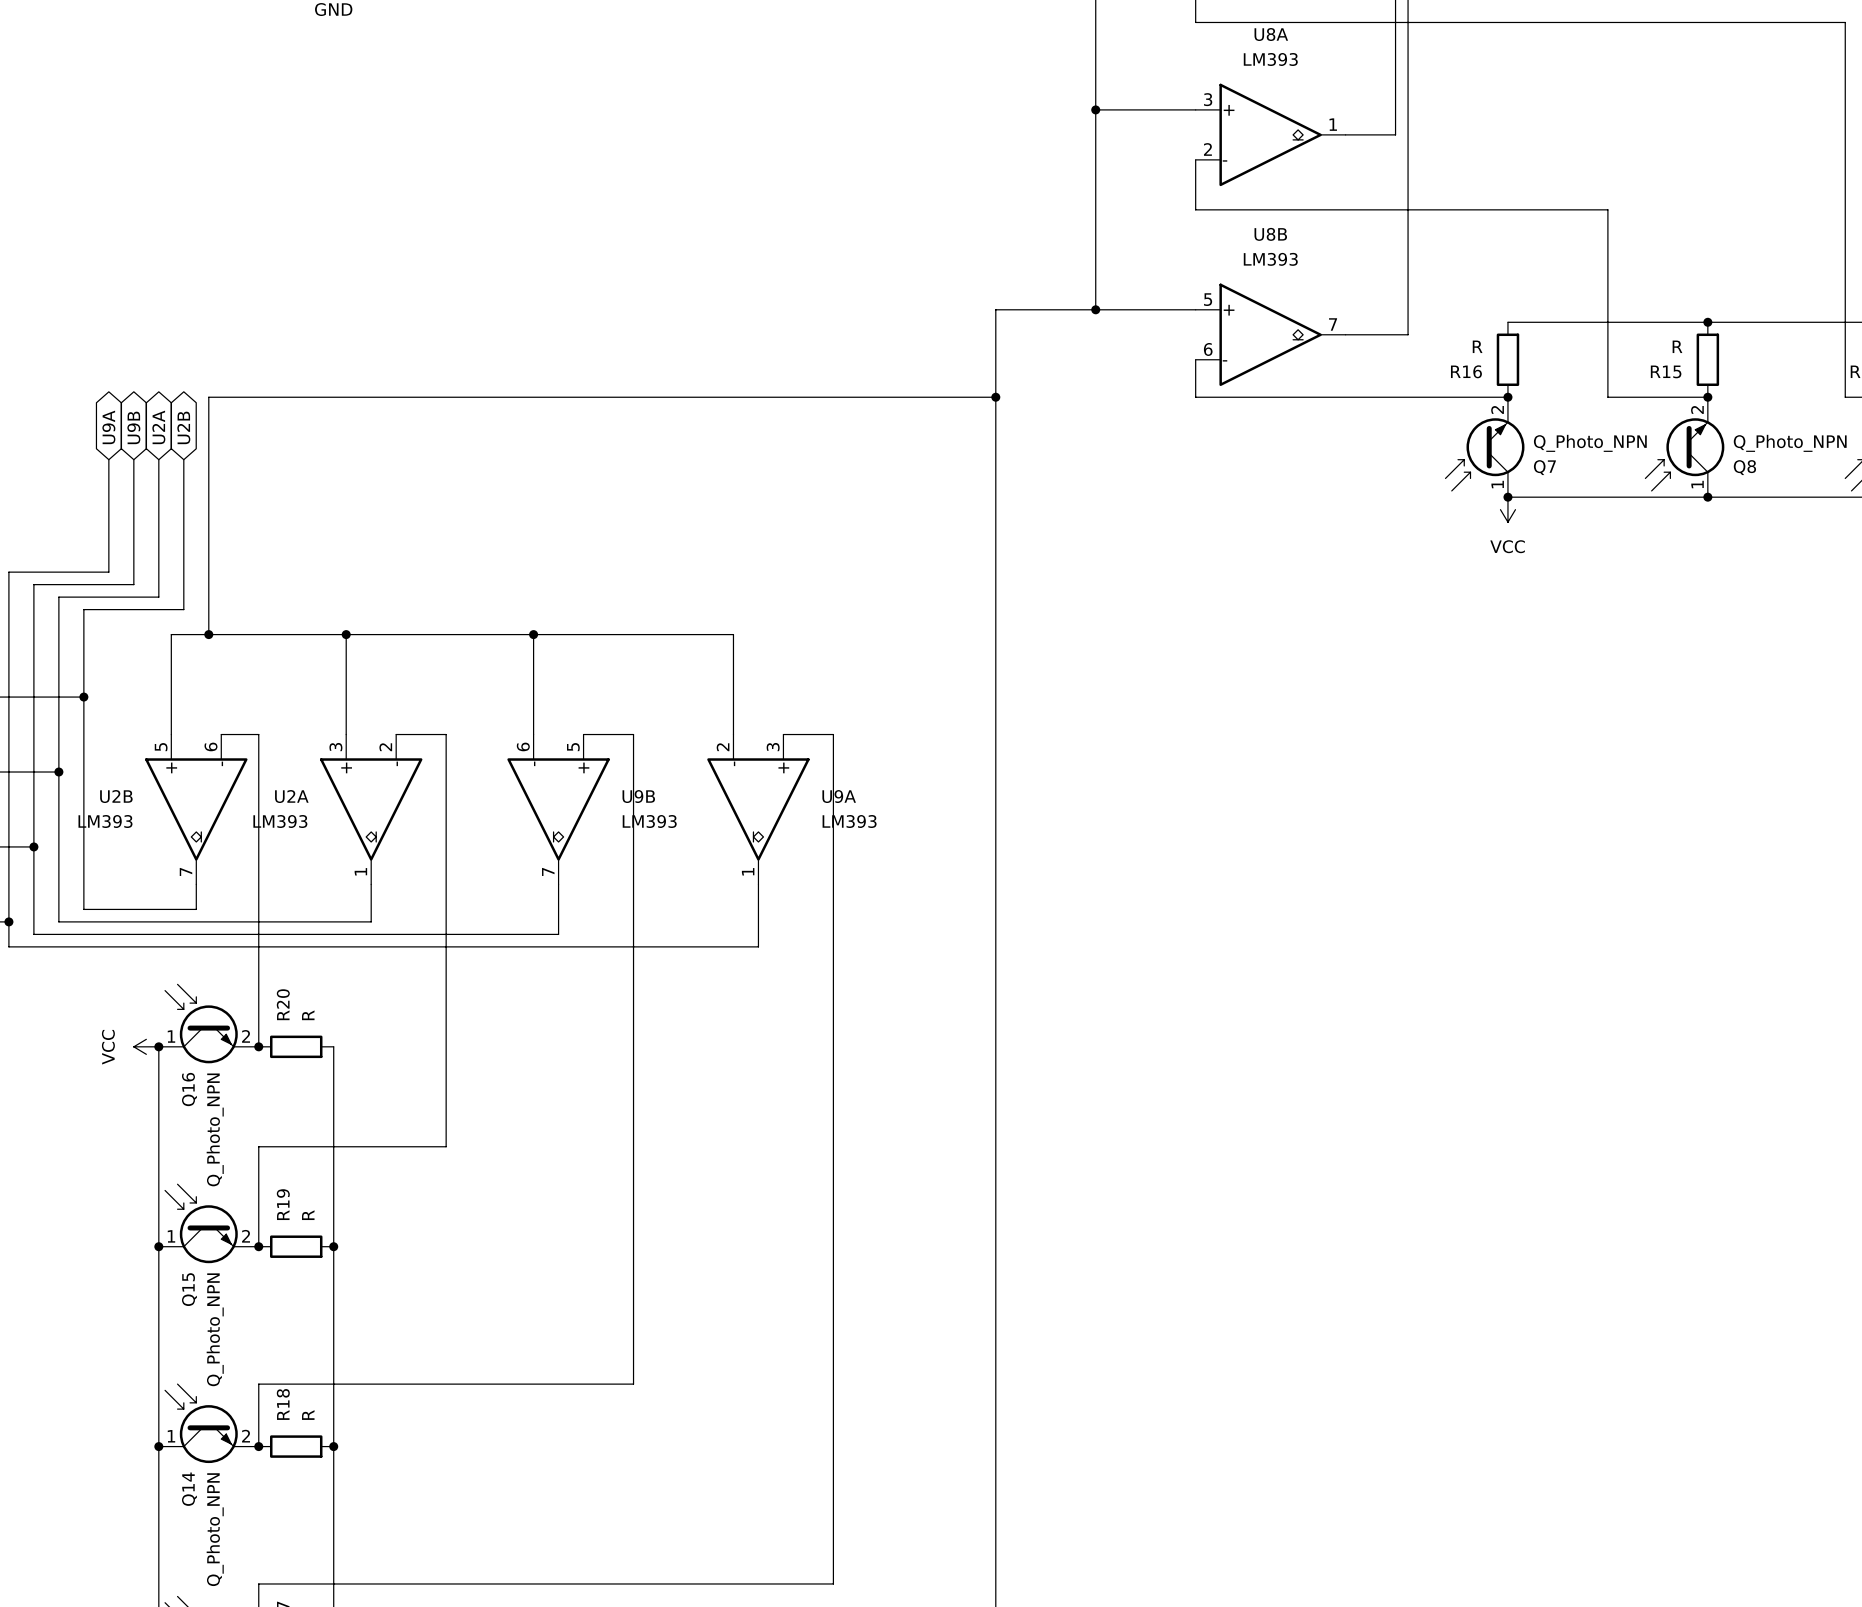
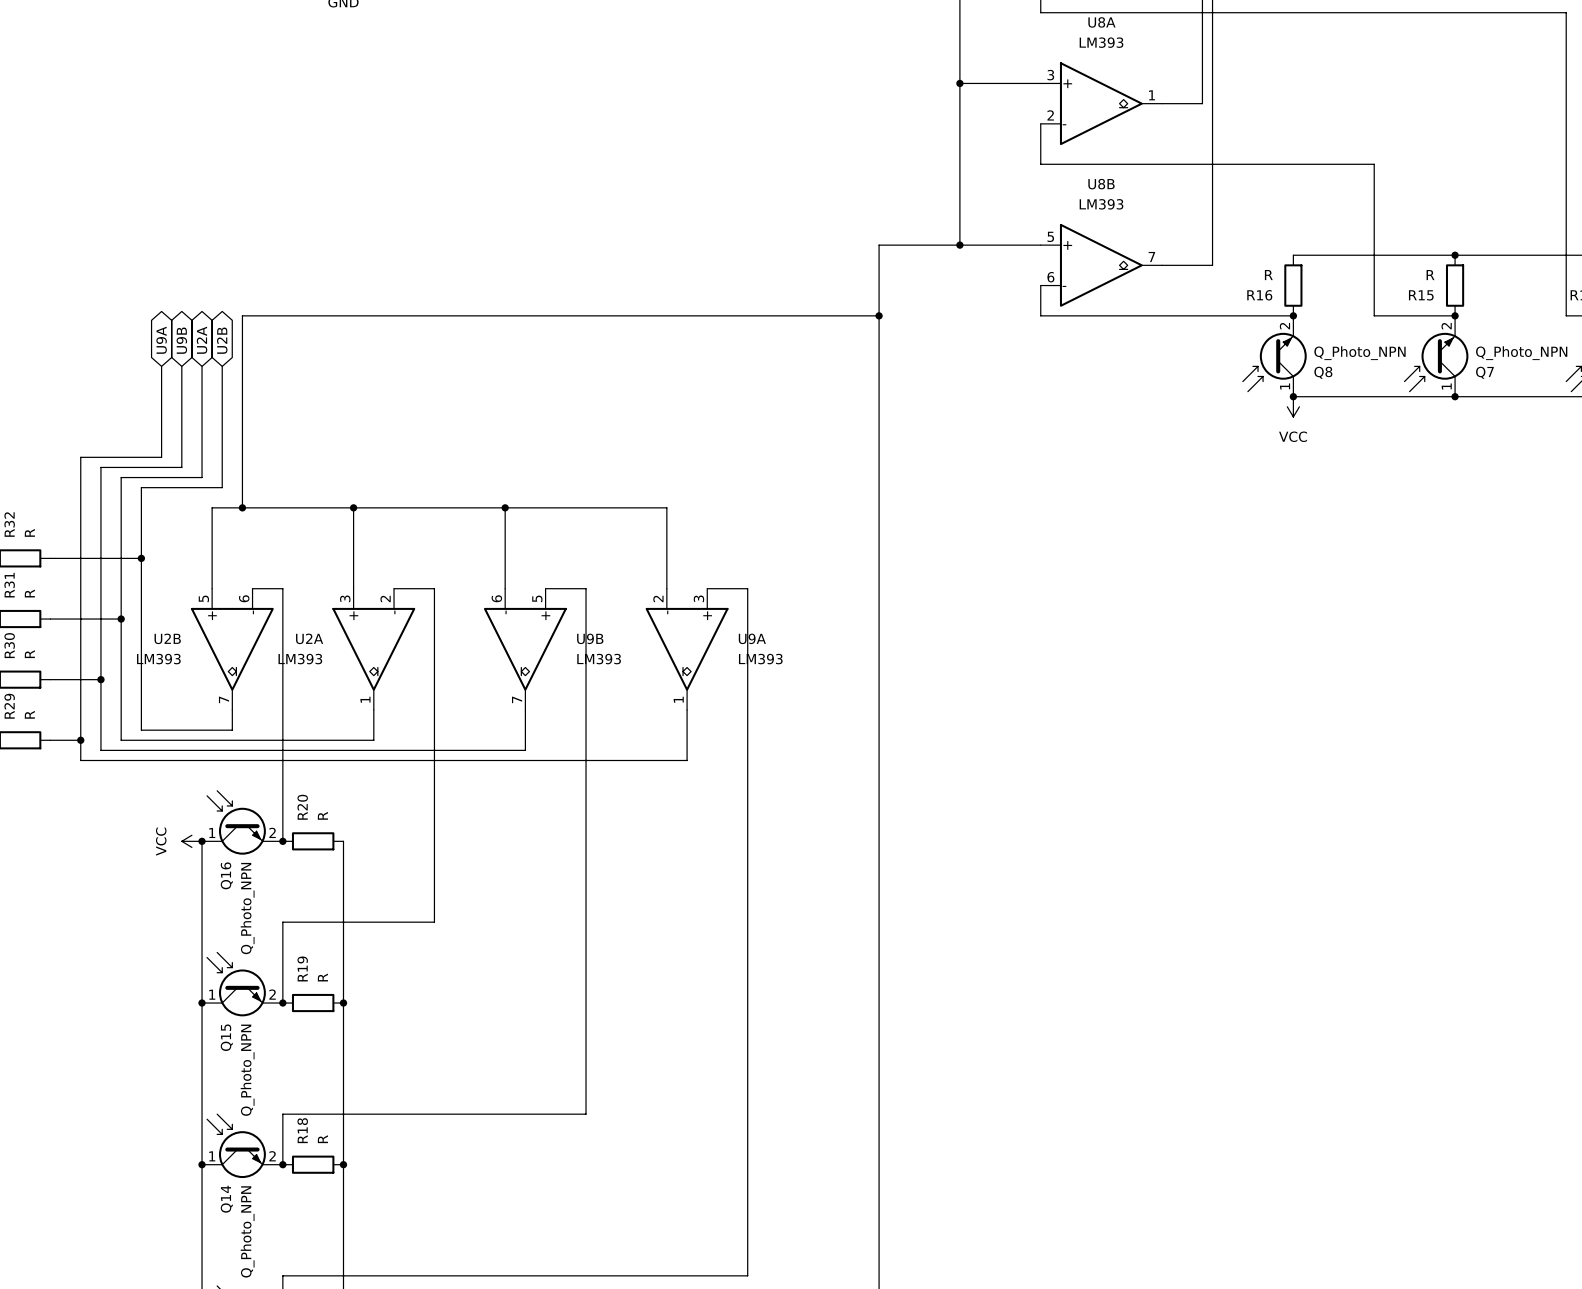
Q7 name: Q7 (1544, 467) -> Q8 (1323, 372)
Q8 name: Q8 (1744, 467) -> Q7 (1484, 372)

